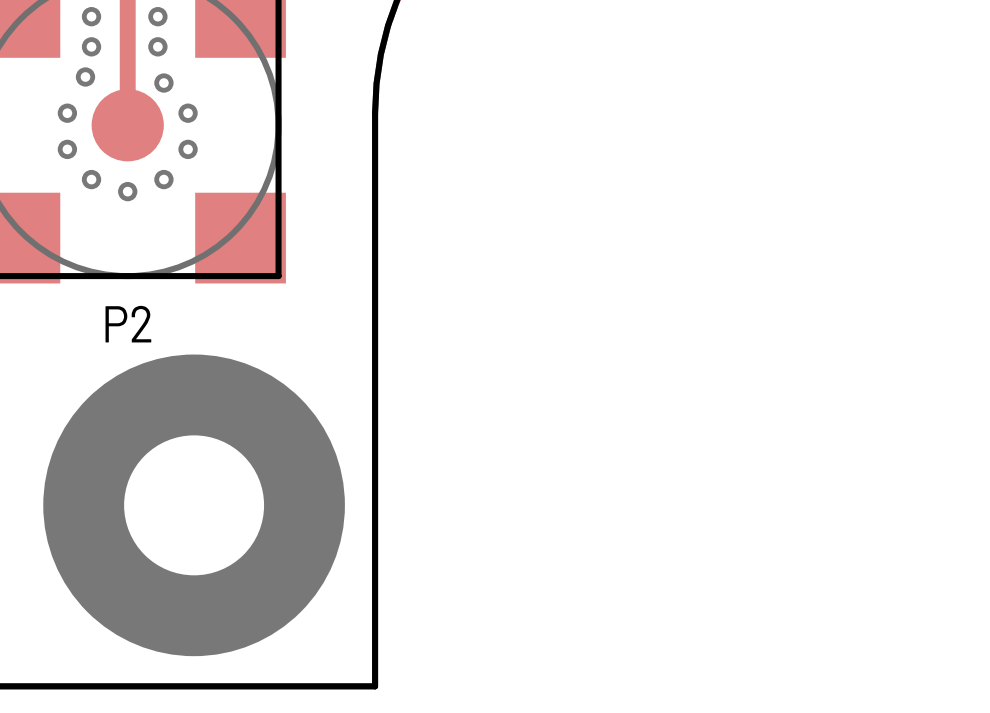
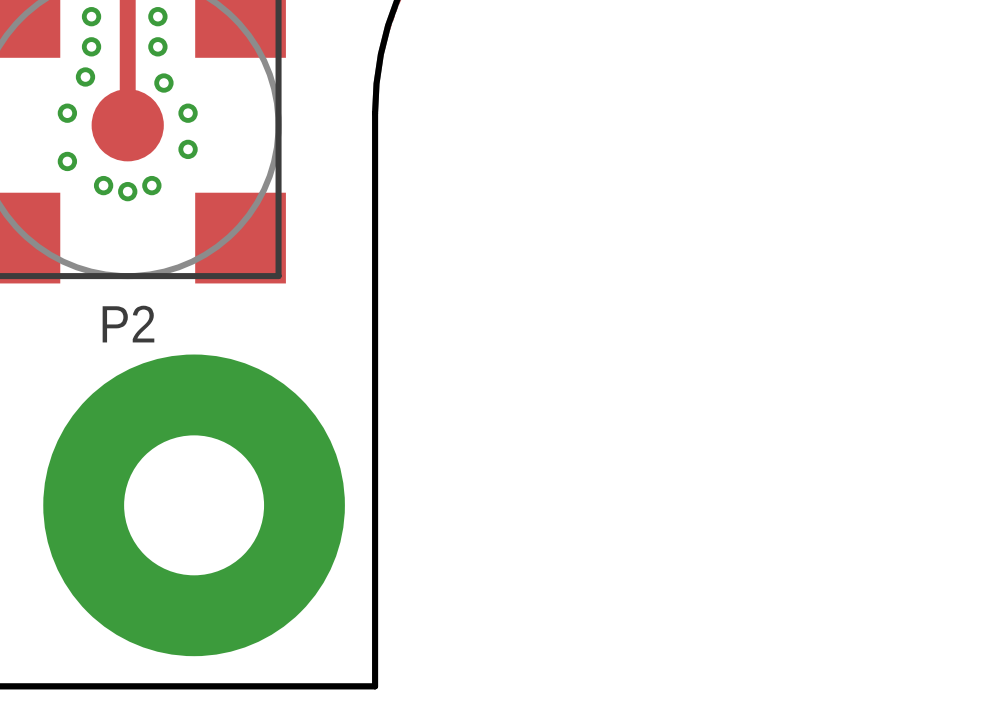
via position: (67, 149) -> (67, 161)
via position: (91, 179) -> (103, 185)
via position: (163, 179) -> (151, 185)

